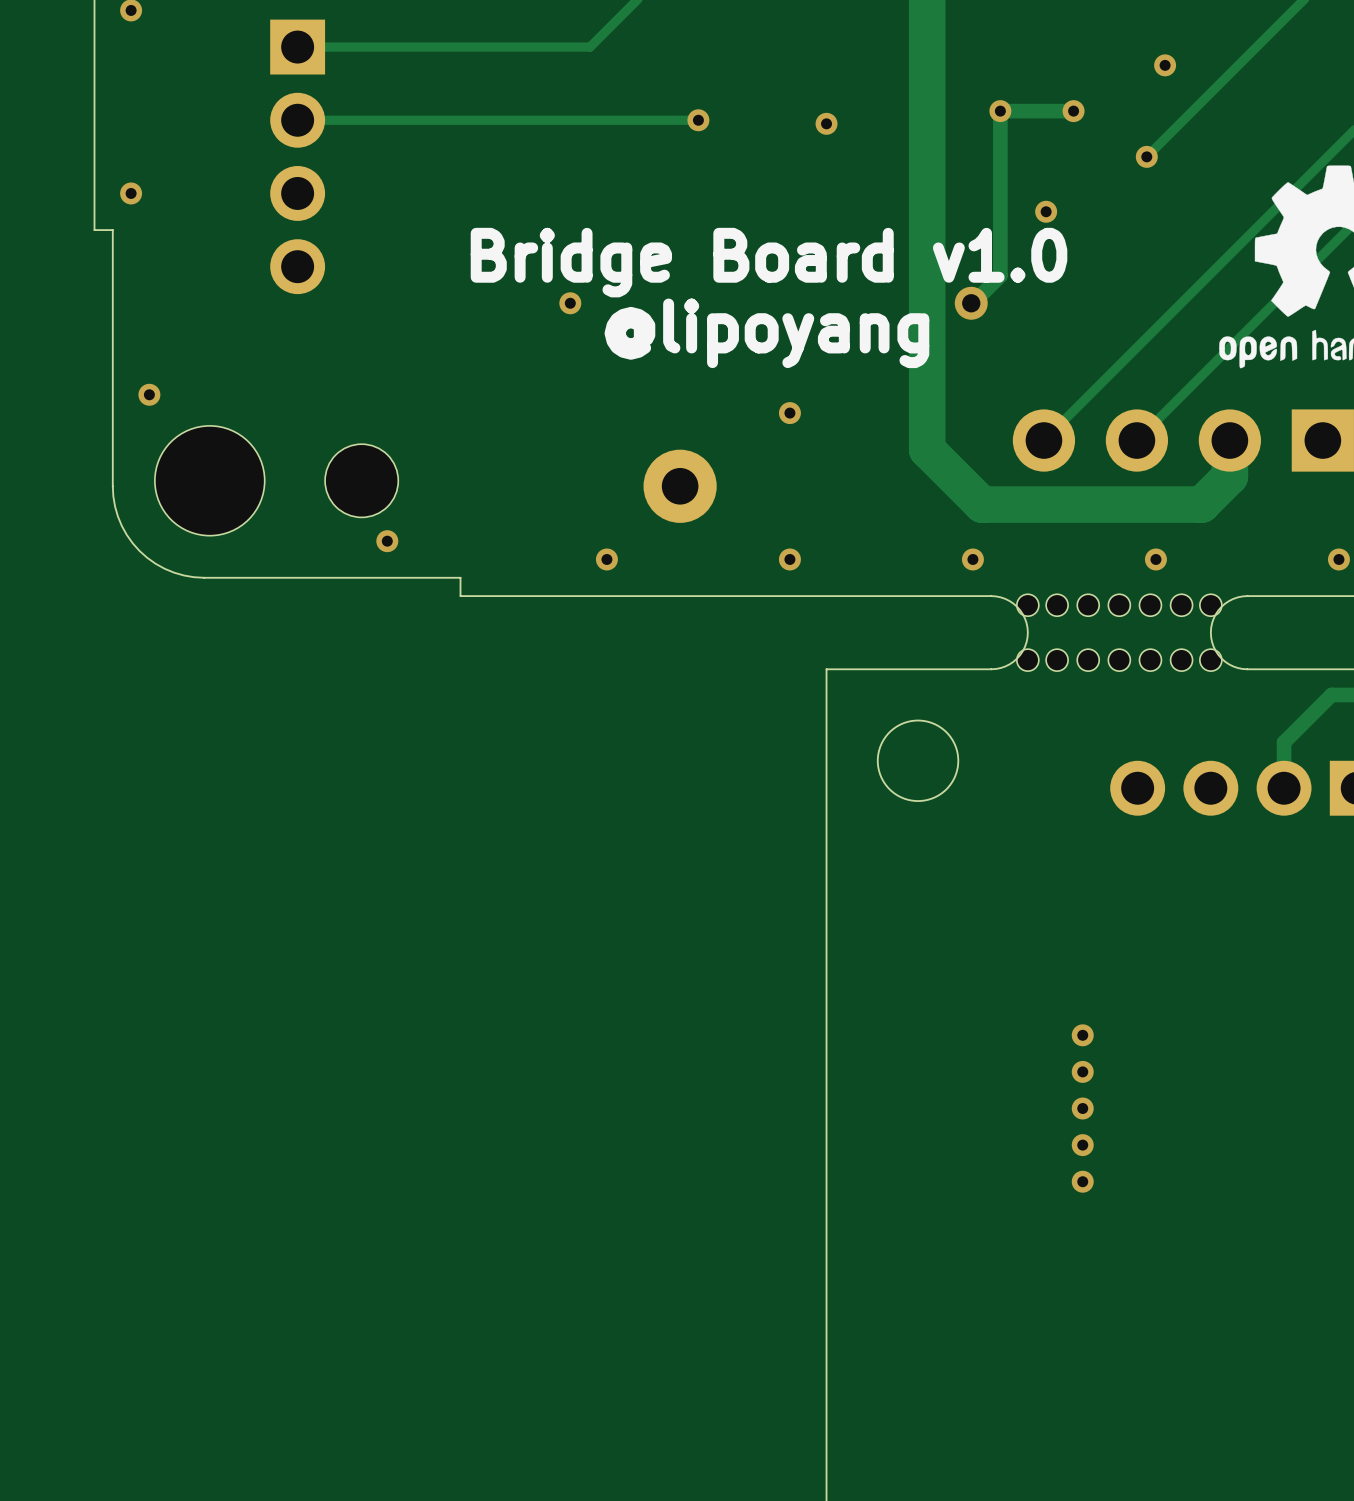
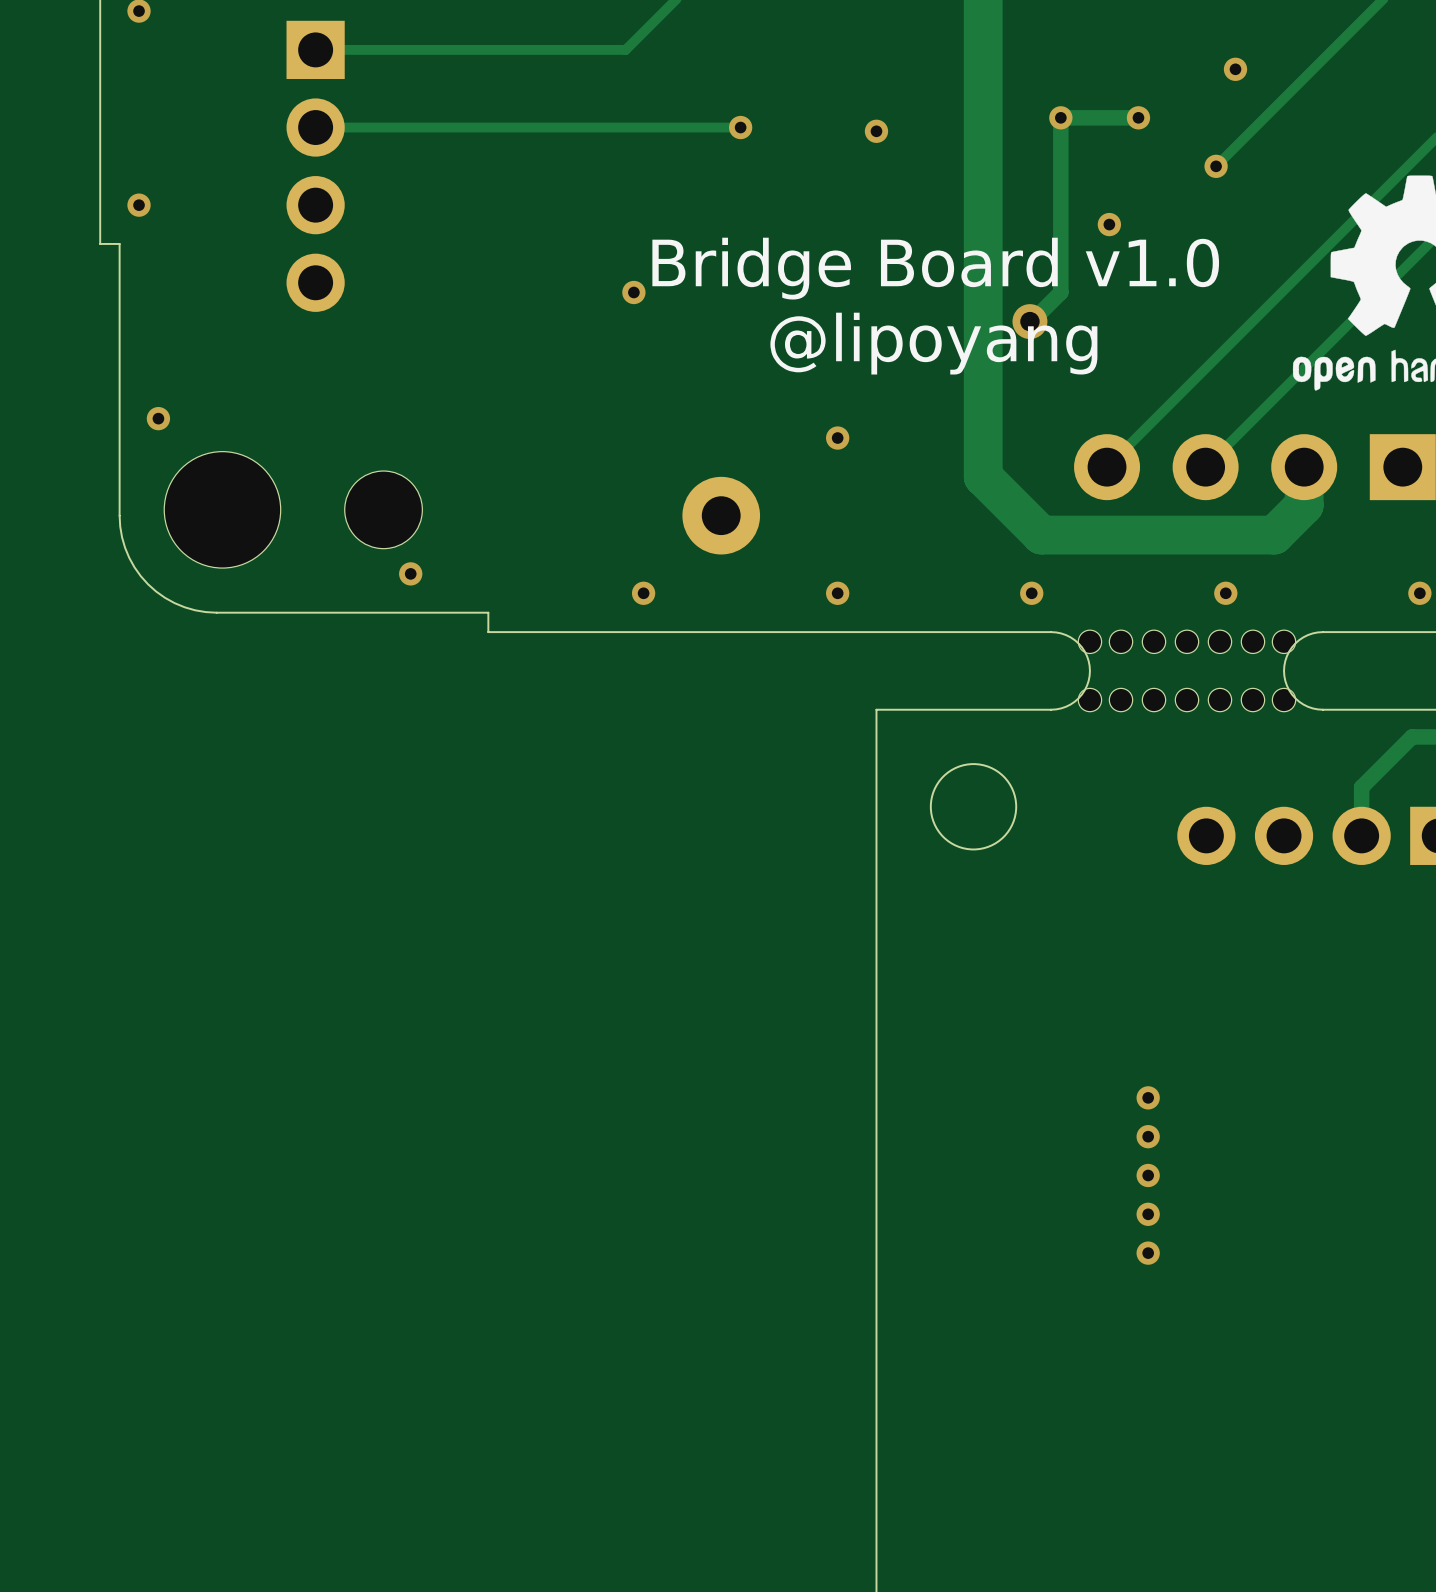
text position: Bridge Board v1.0 (769, 262) -> Bridge Board v1.0 (935, 268)
via position: (570, 303) -> (633, 292)
text position: @lipoyang (766, 333) -> @lipoyang (933, 343)

